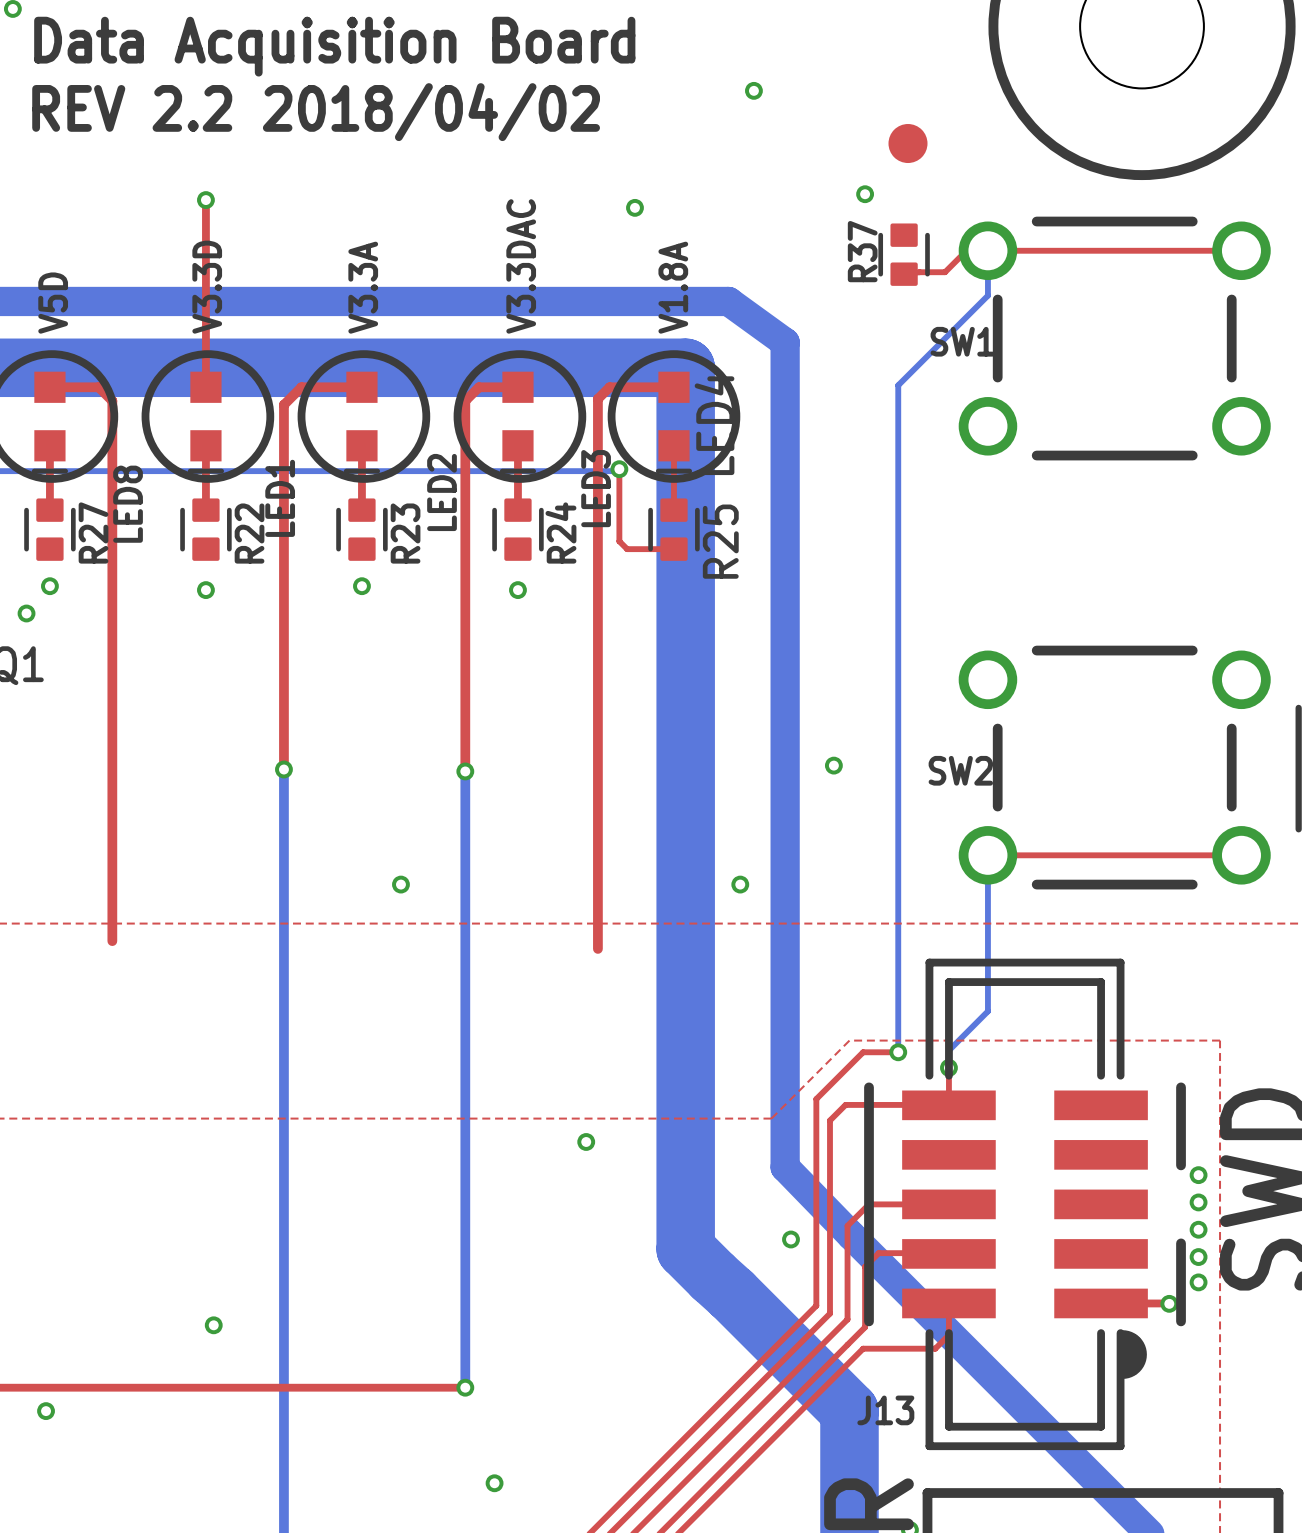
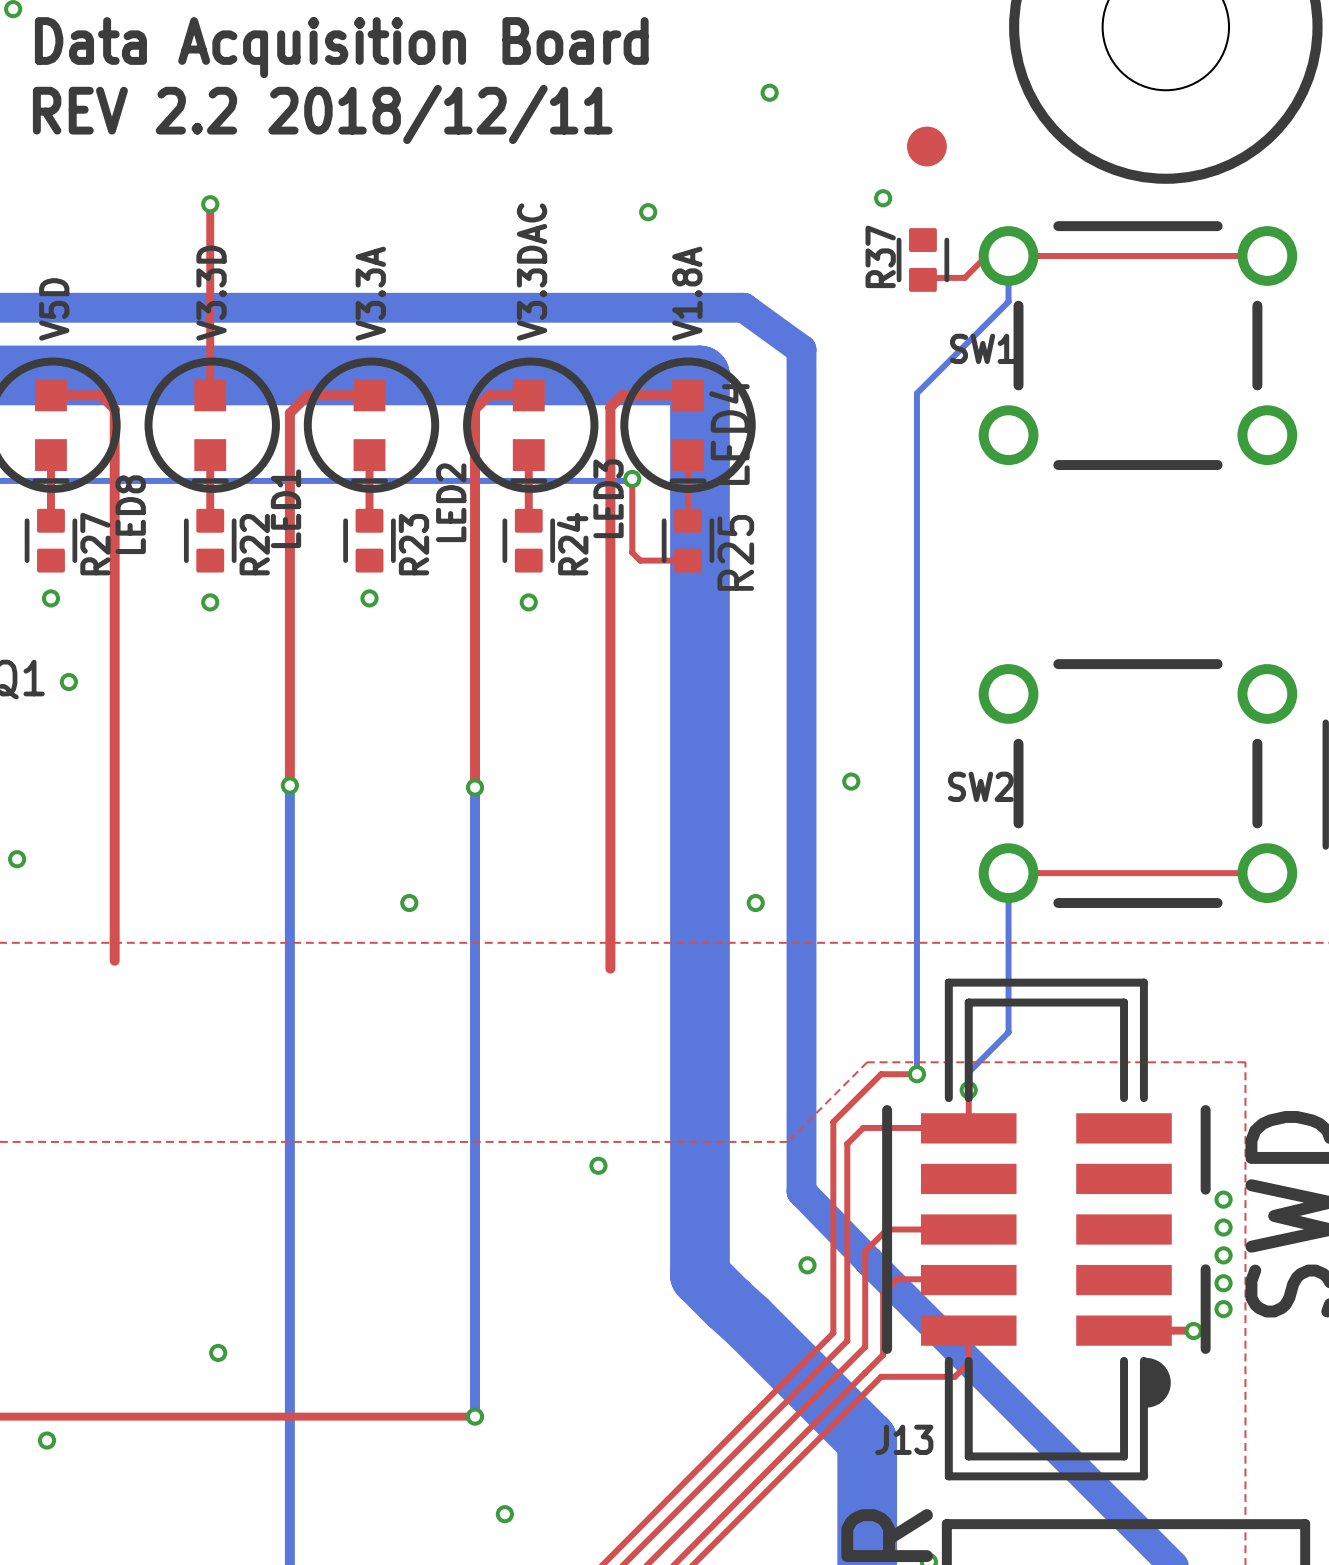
text: REV 2.2 2018/04/02 (316, 112) -> REV 2.2 2018/12/11 (322, 114)
via position: (26, 613) -> (68, 682)
via: none -> (17, 859)

